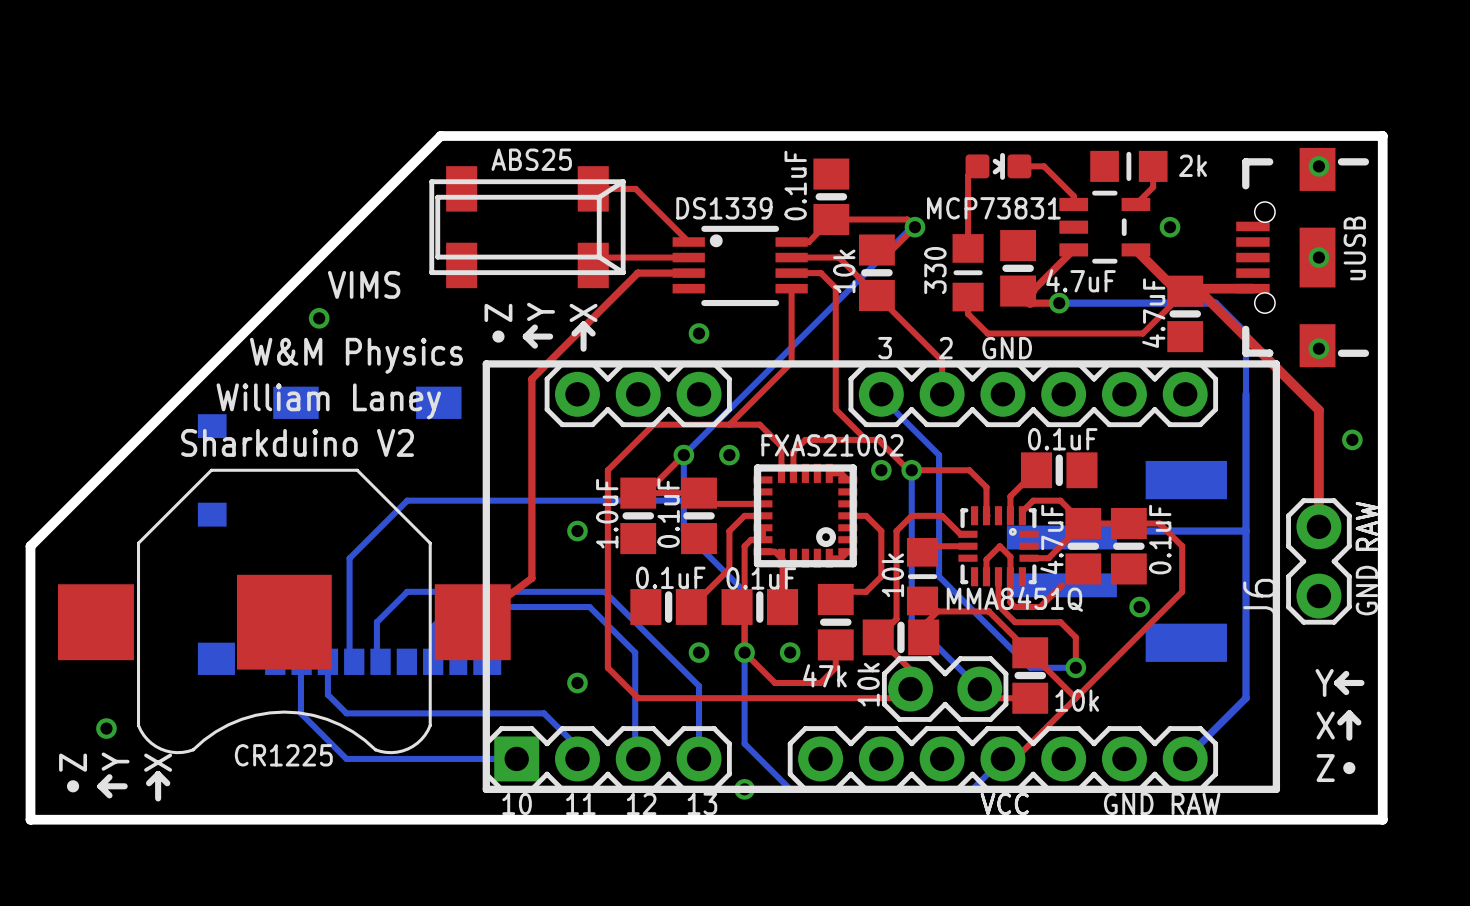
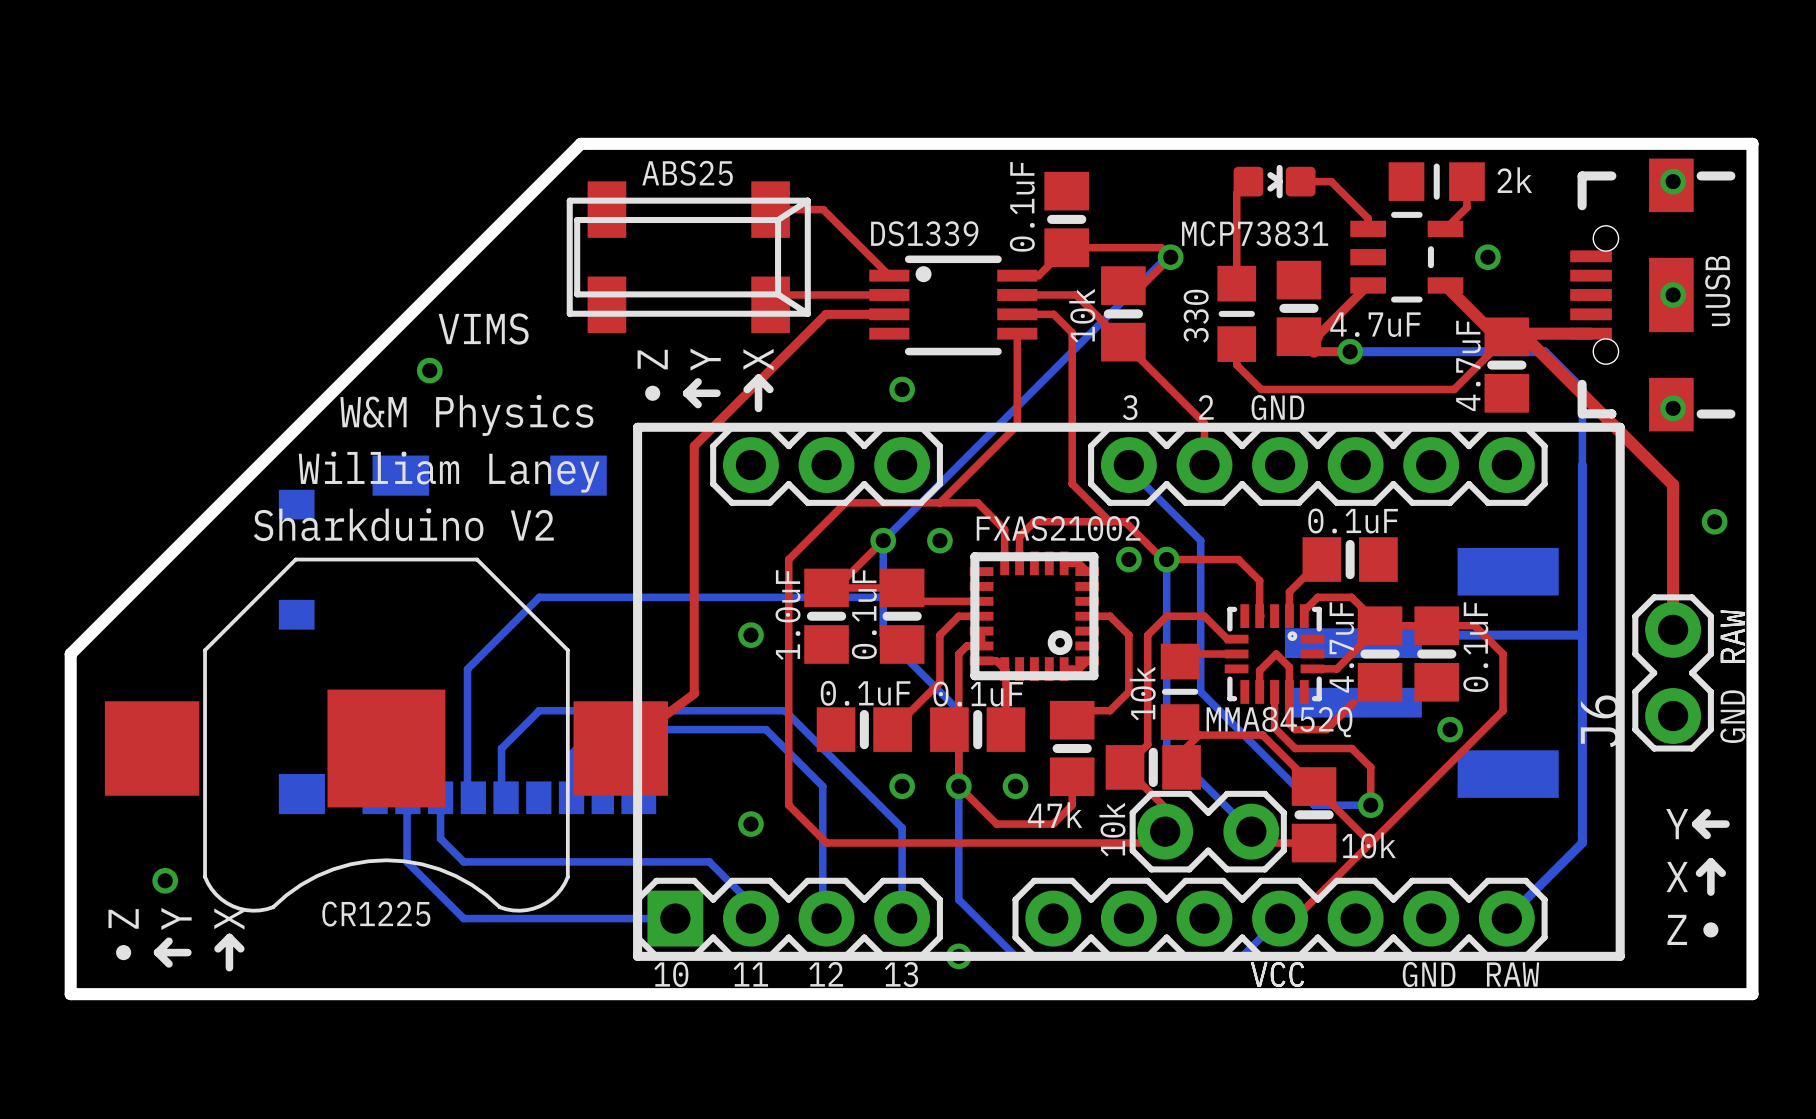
text: MMA8451Q (1014, 599) -> MMA8452Q (1279, 722)

